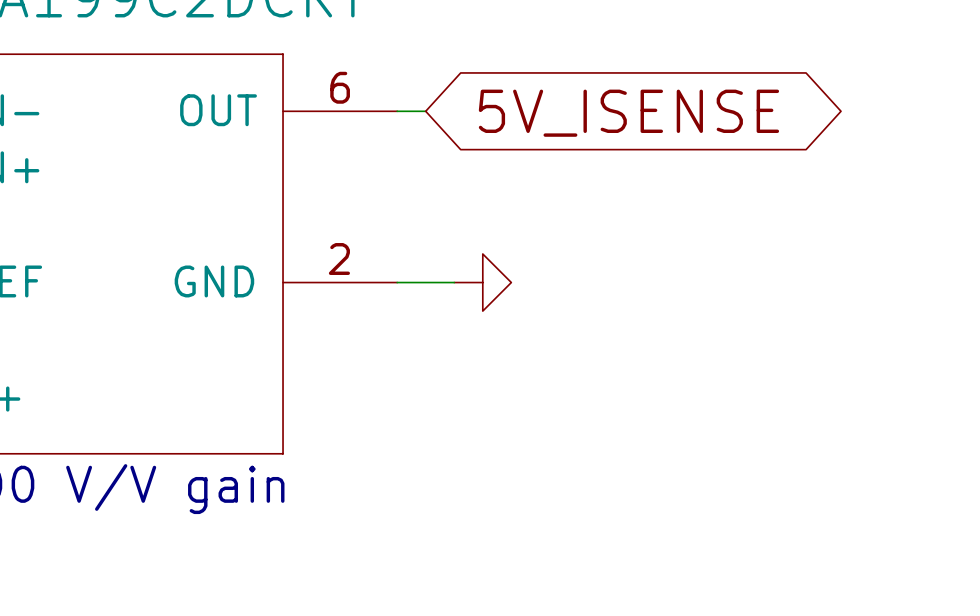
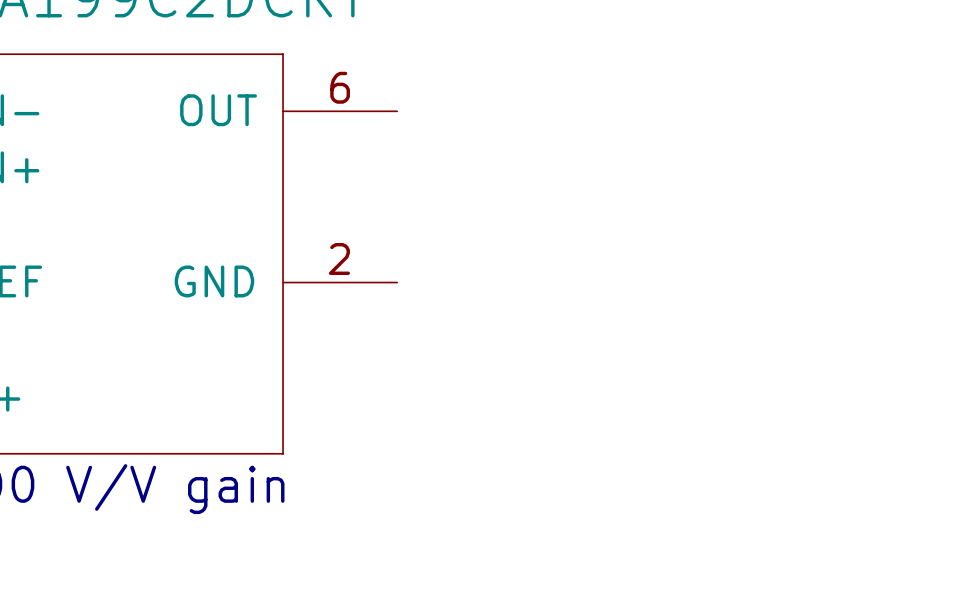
wire: (397, 111) (425, 111) -> none
global label: 5V_ISENSE (628, 113) -> none
wire: (397, 282) (454, 282) -> none
power symbol: (482, 282) -> none

